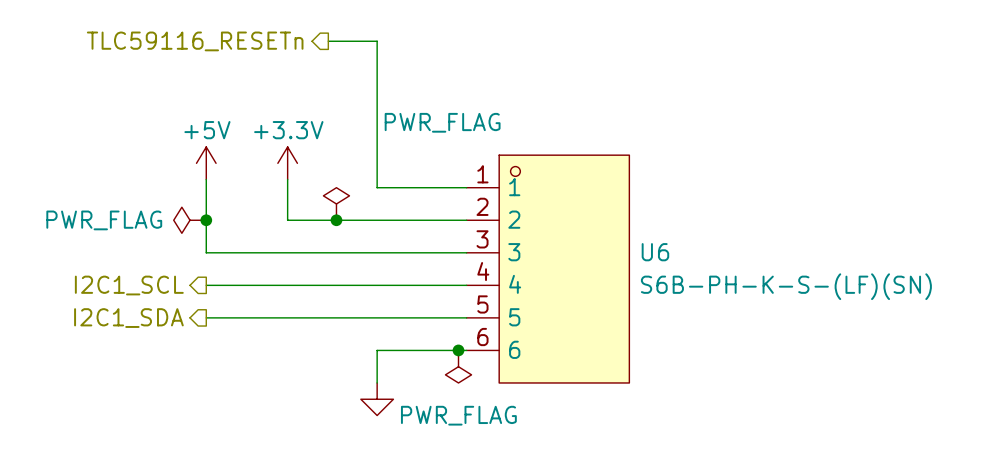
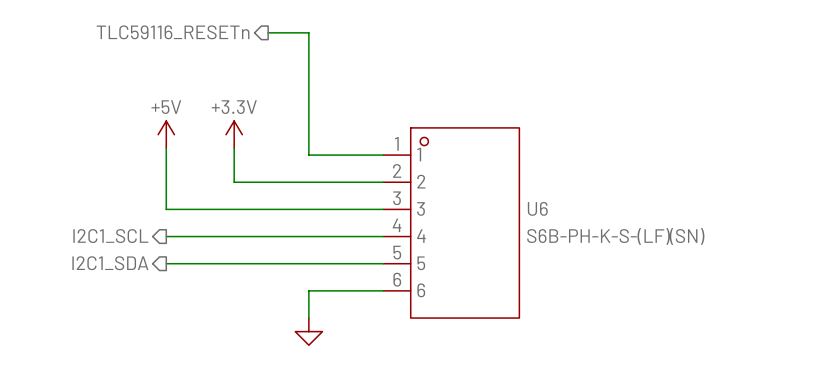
power symbol: PWR_FLAG (336, 203) -> none
power symbol: PWR_FLAG (190, 220) -> none
junction: (206, 220) -> none
junction: (336, 220) -> none
junction: (458, 350) -> none
power symbol: PWR_FLAG (458, 366) -> none

